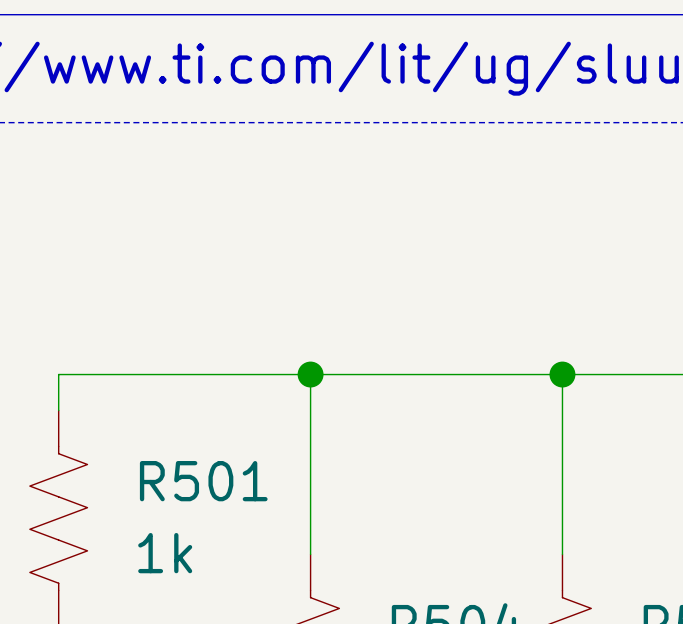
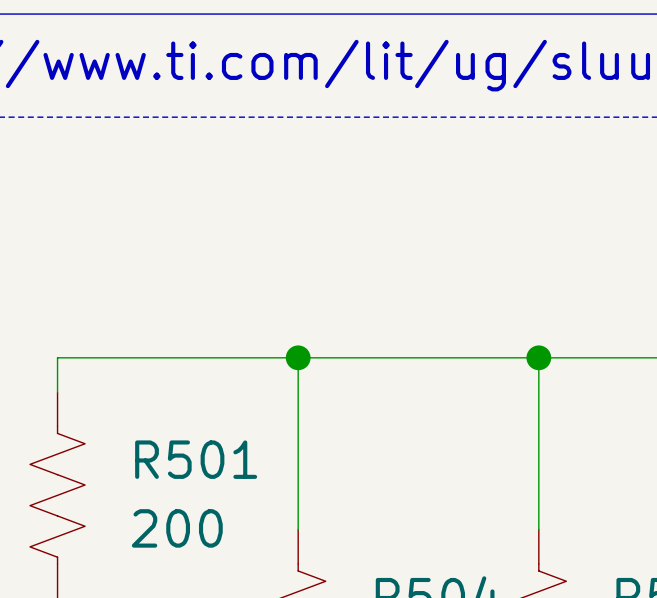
R501 value: 1k (165, 553) -> 200 (177, 528)

